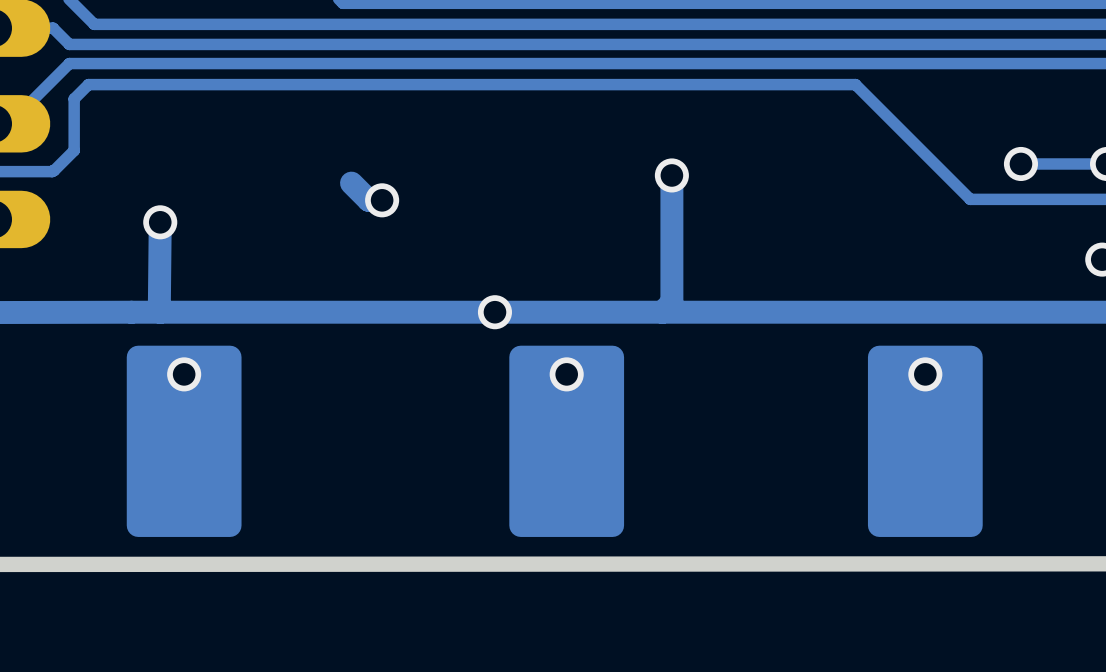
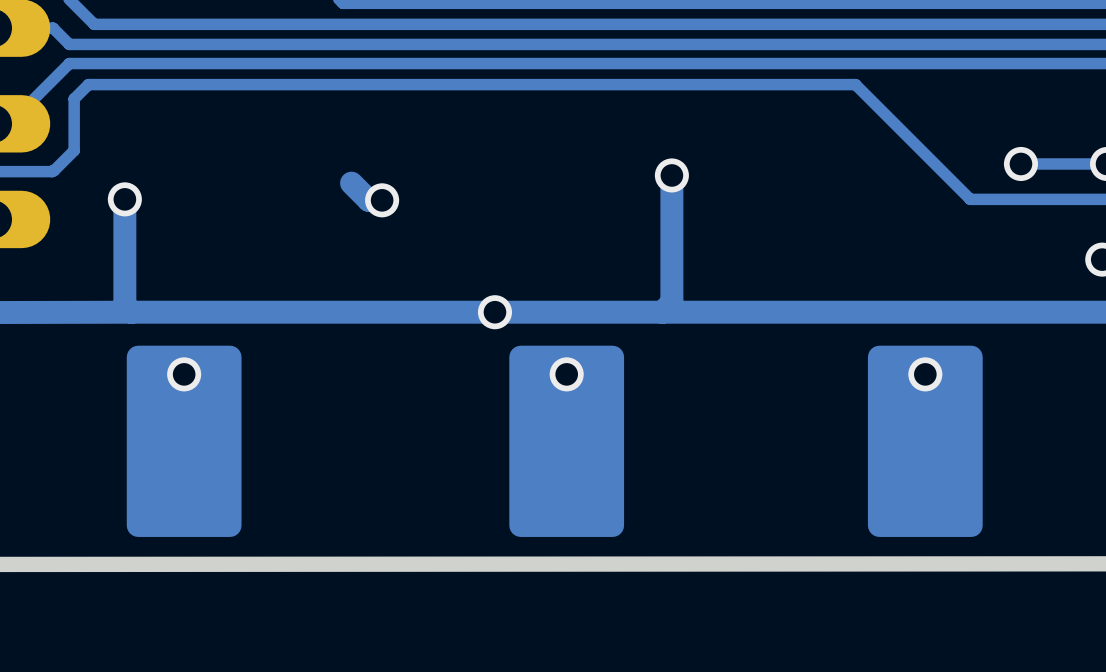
track: none -> (124, 199) (124, 305) (131, 312)
track: (160, 222) (160, 312) -> none
via position: (160, 222) -> (124, 199)

